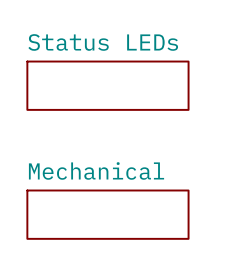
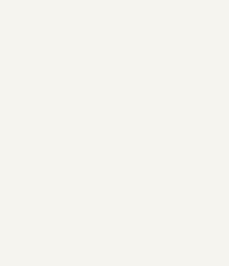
sheet Status LEDs: (107, 85) -> none
sheet Mechanical: (107, 214) -> none

